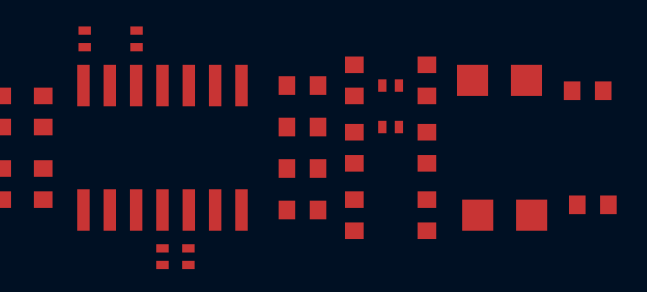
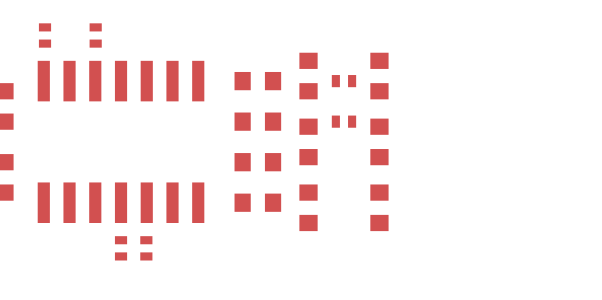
part: (499, 80) -> none
part: (587, 90) -> none
part: (592, 204) -> none
part: (504, 215) -> none

